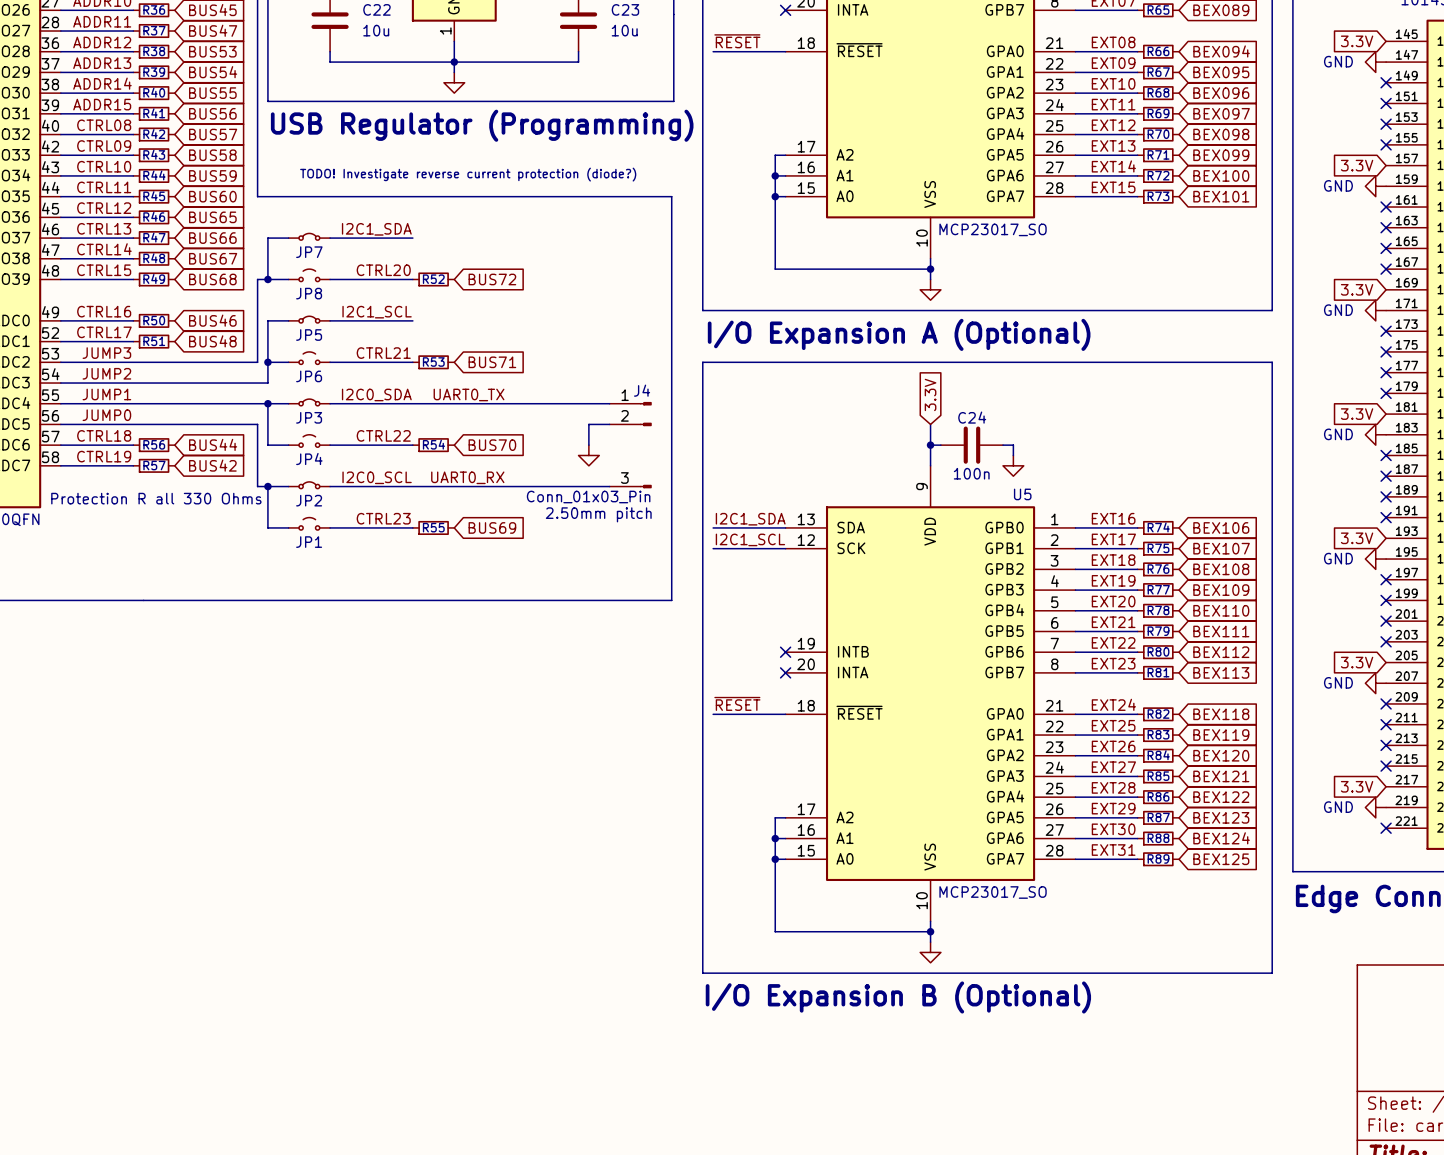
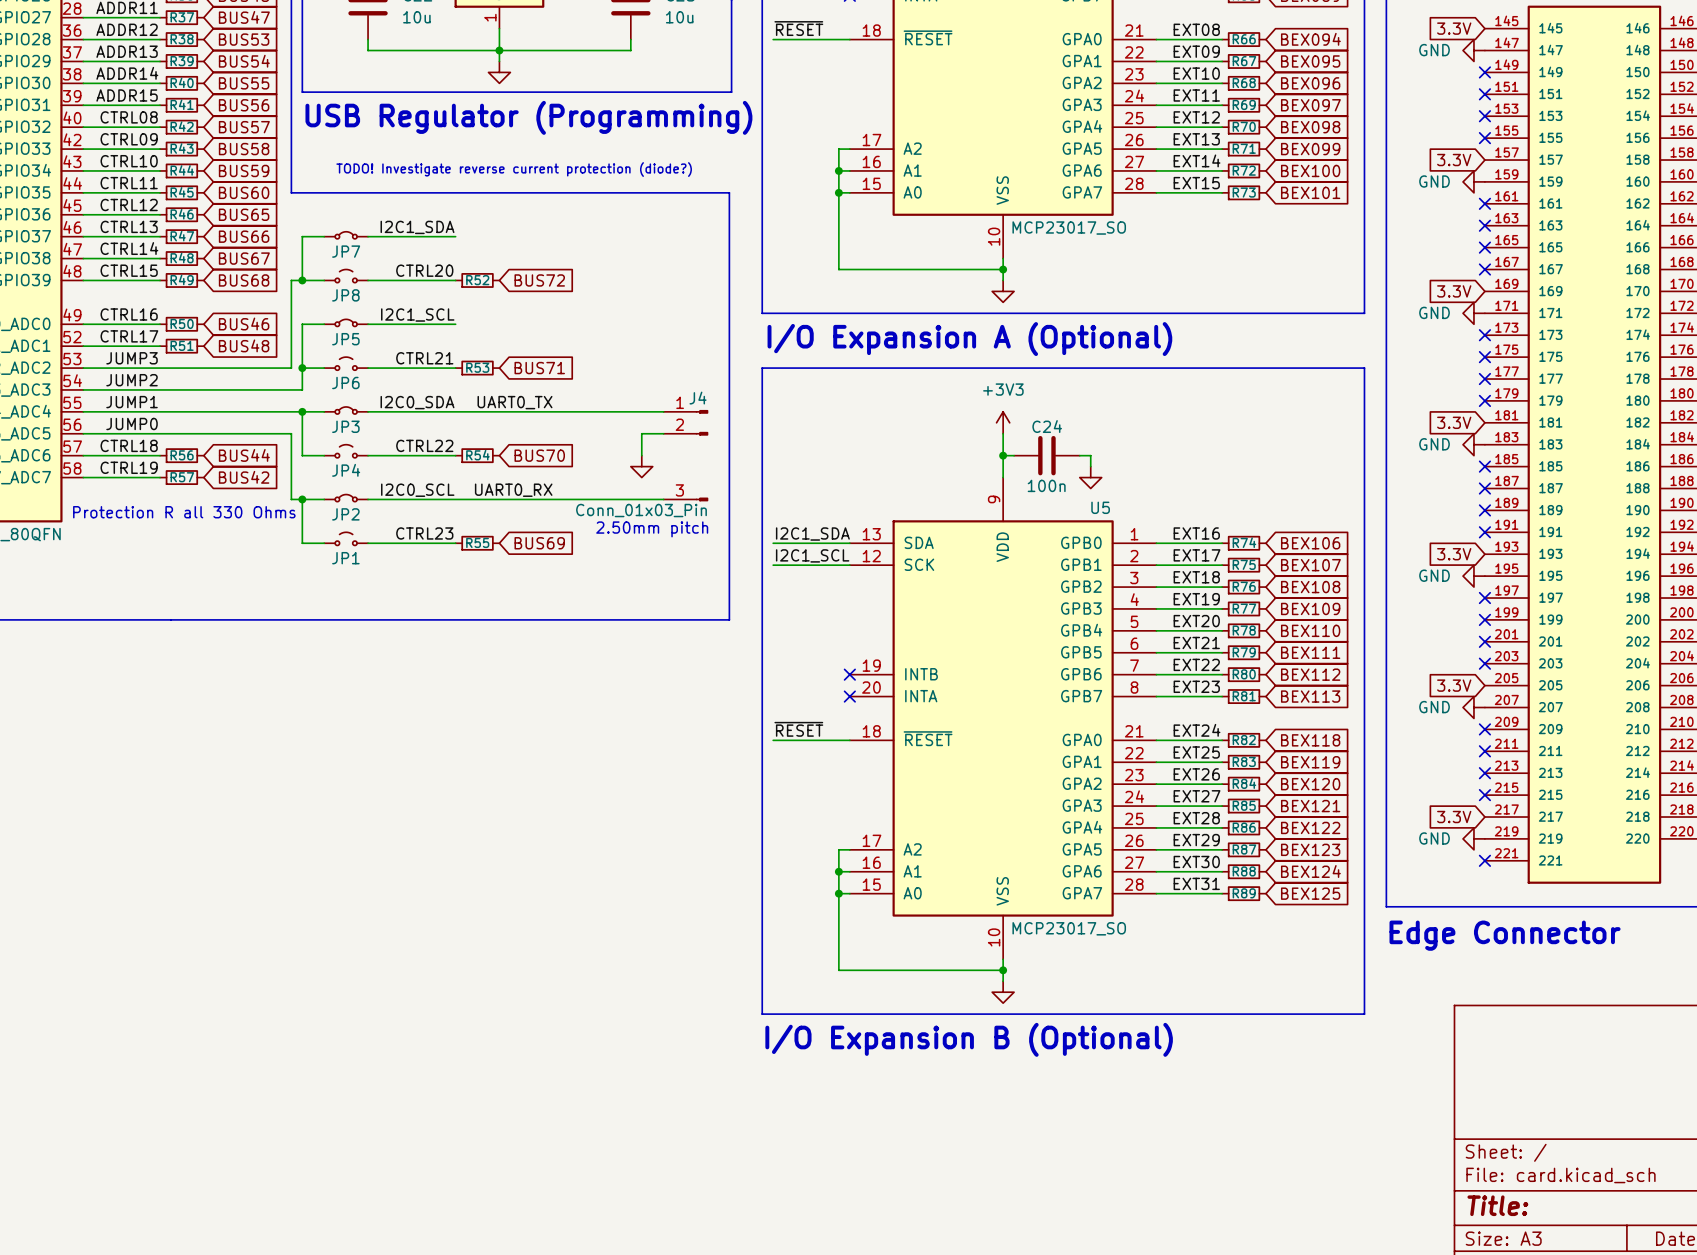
global label: 3.3V (930, 394) -> none
power symbol: none -> +3V3 (1003, 422)

